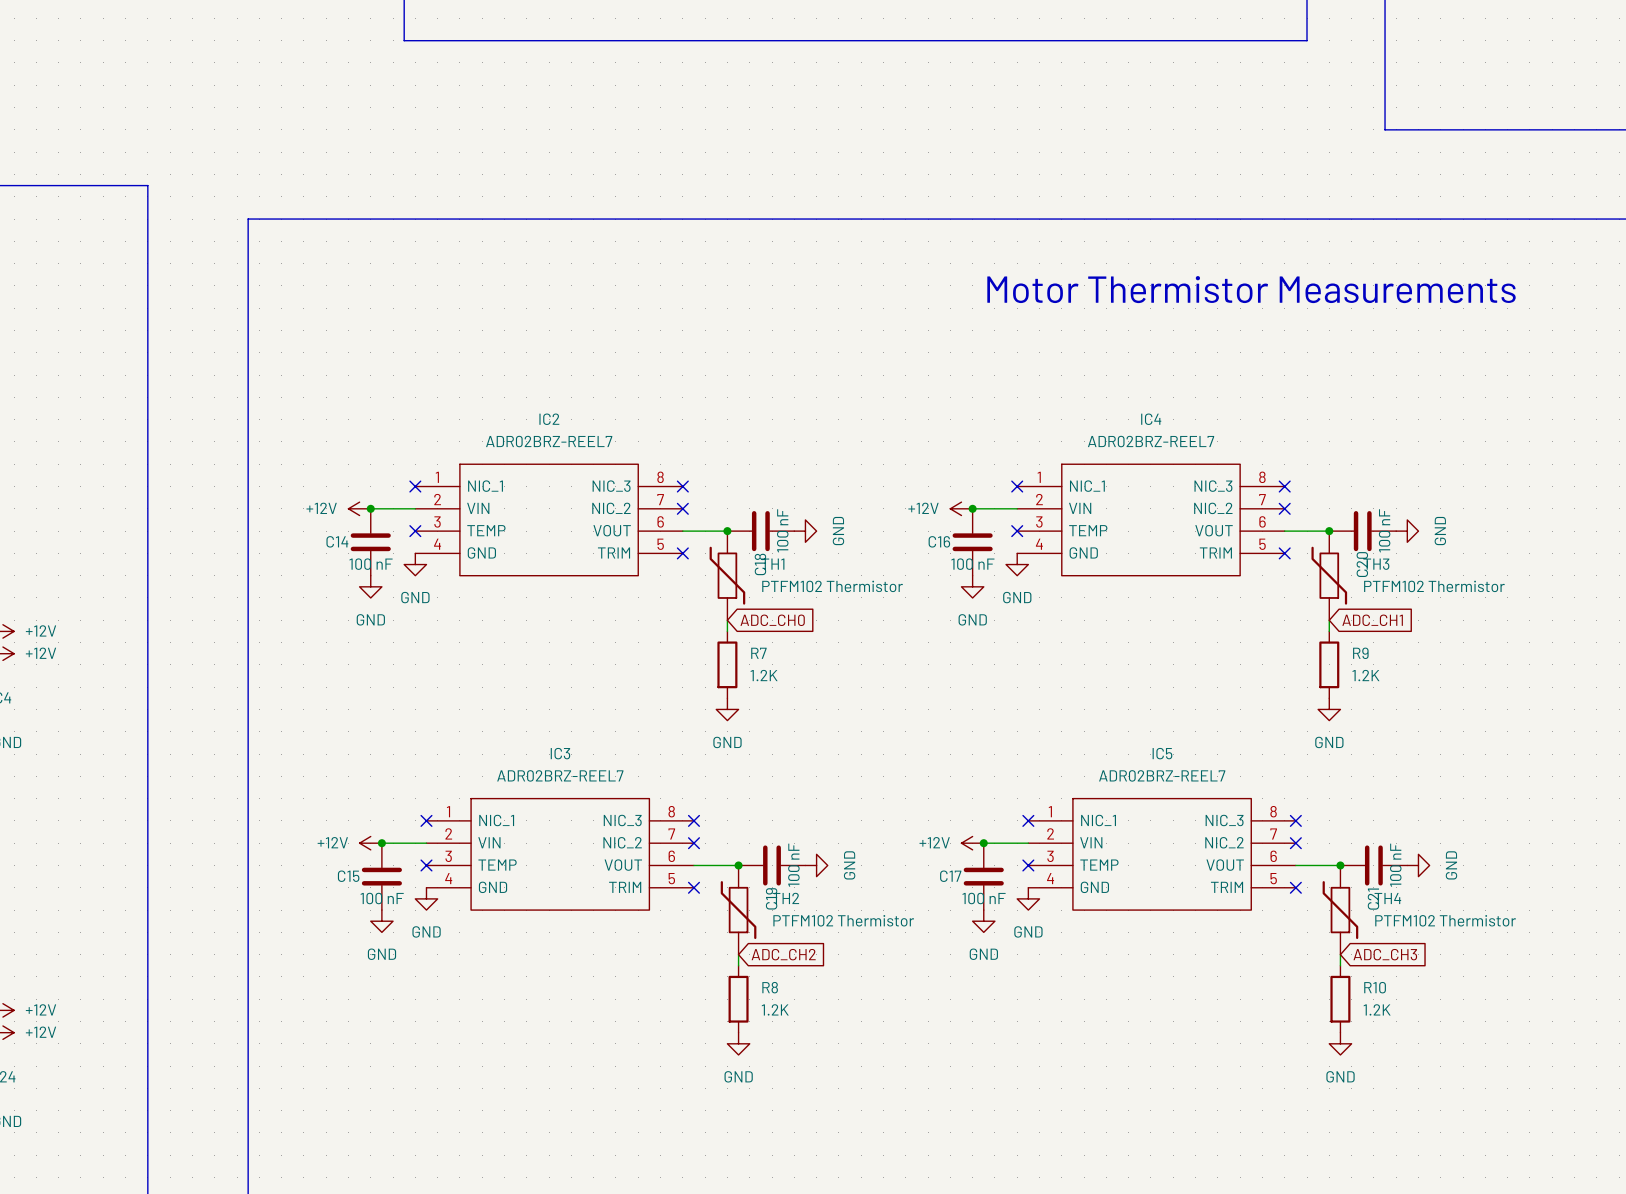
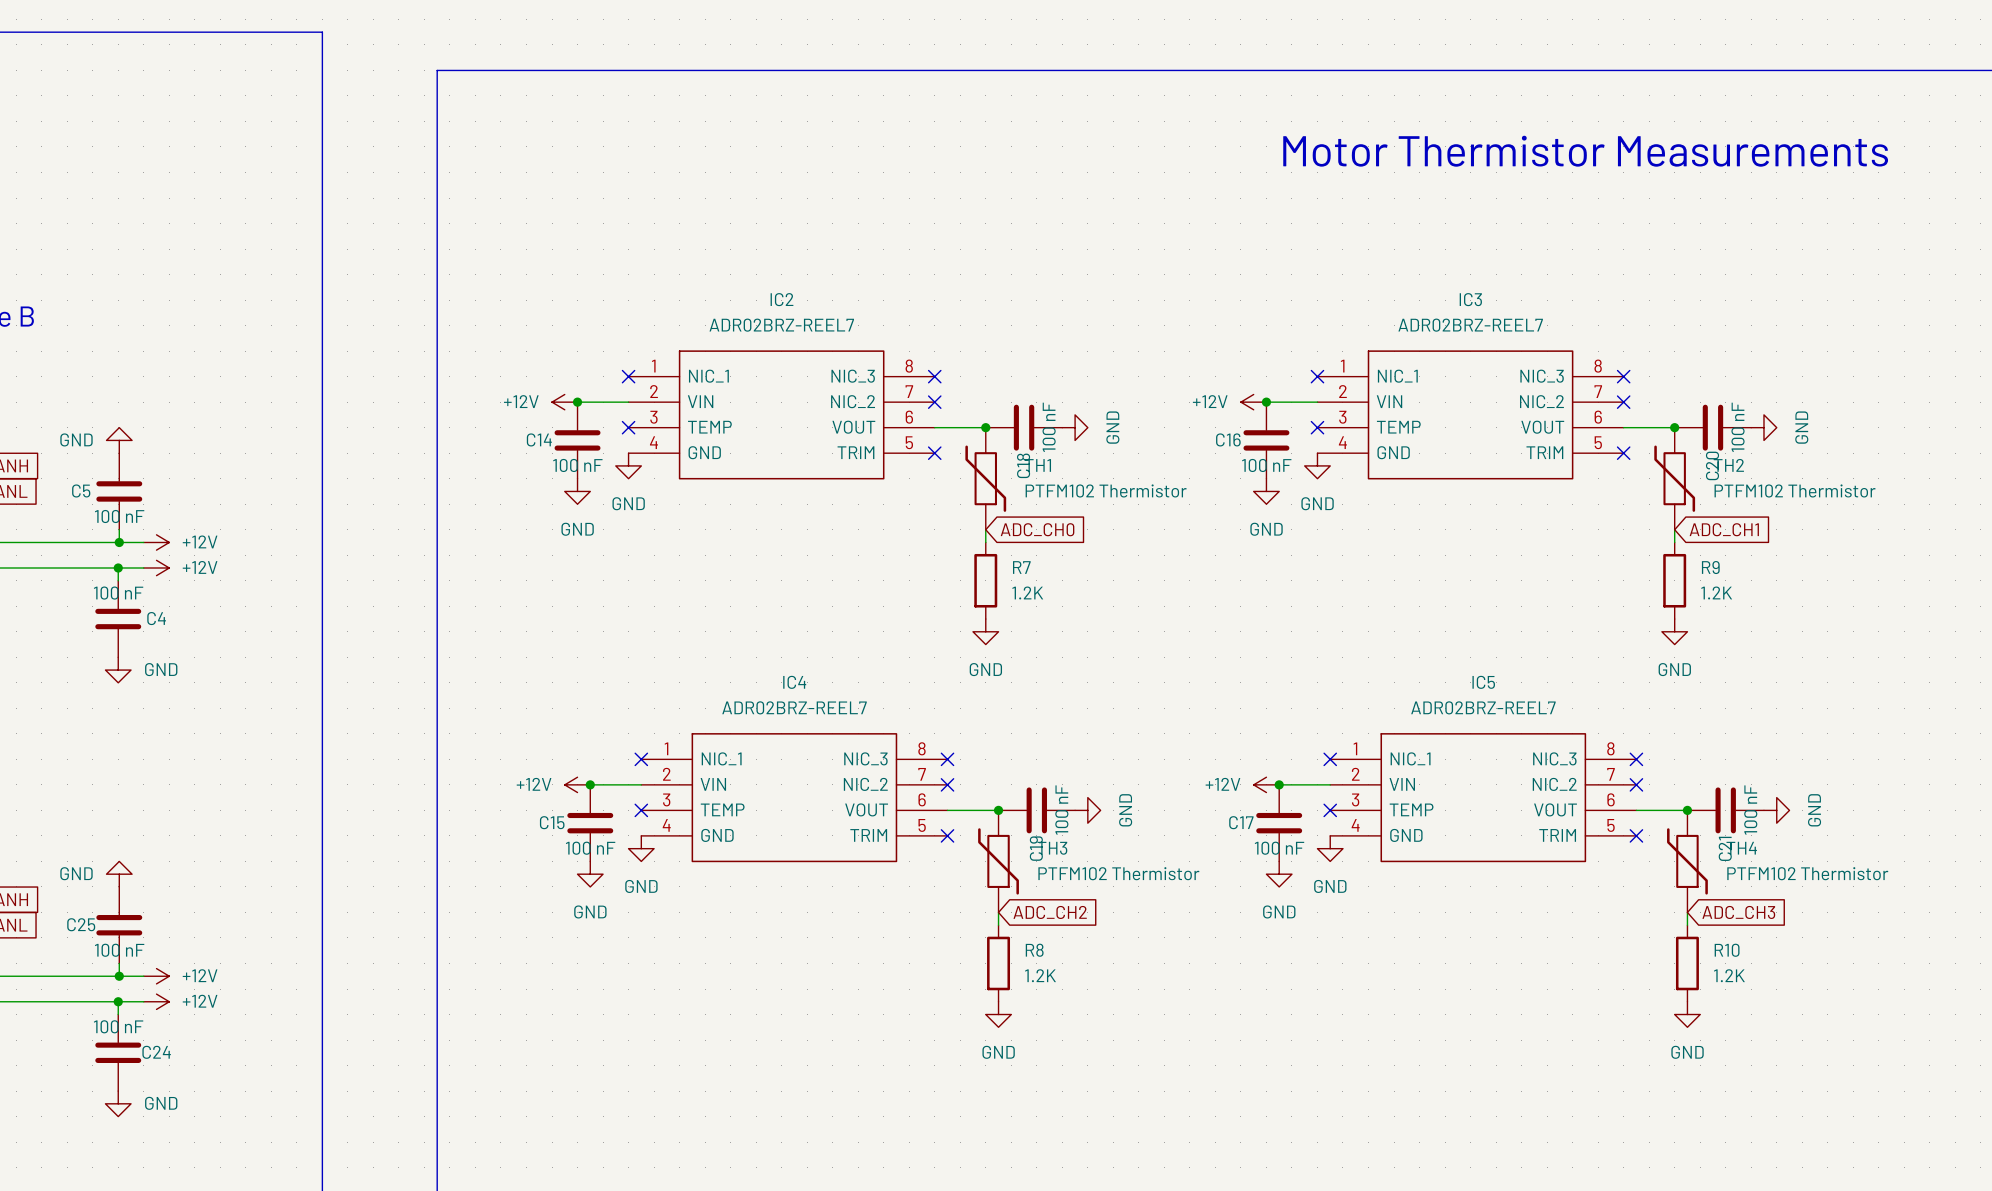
IC4 name: IC4 (1151, 419) -> IC3 (1470, 299)
TH3 name: TH3 (1376, 564) -> TH2 (1728, 465)
IC3 name: IC3 (560, 753) -> IC4 (794, 682)
TH2 name: TH2 (785, 898) -> TH3 (1052, 848)

